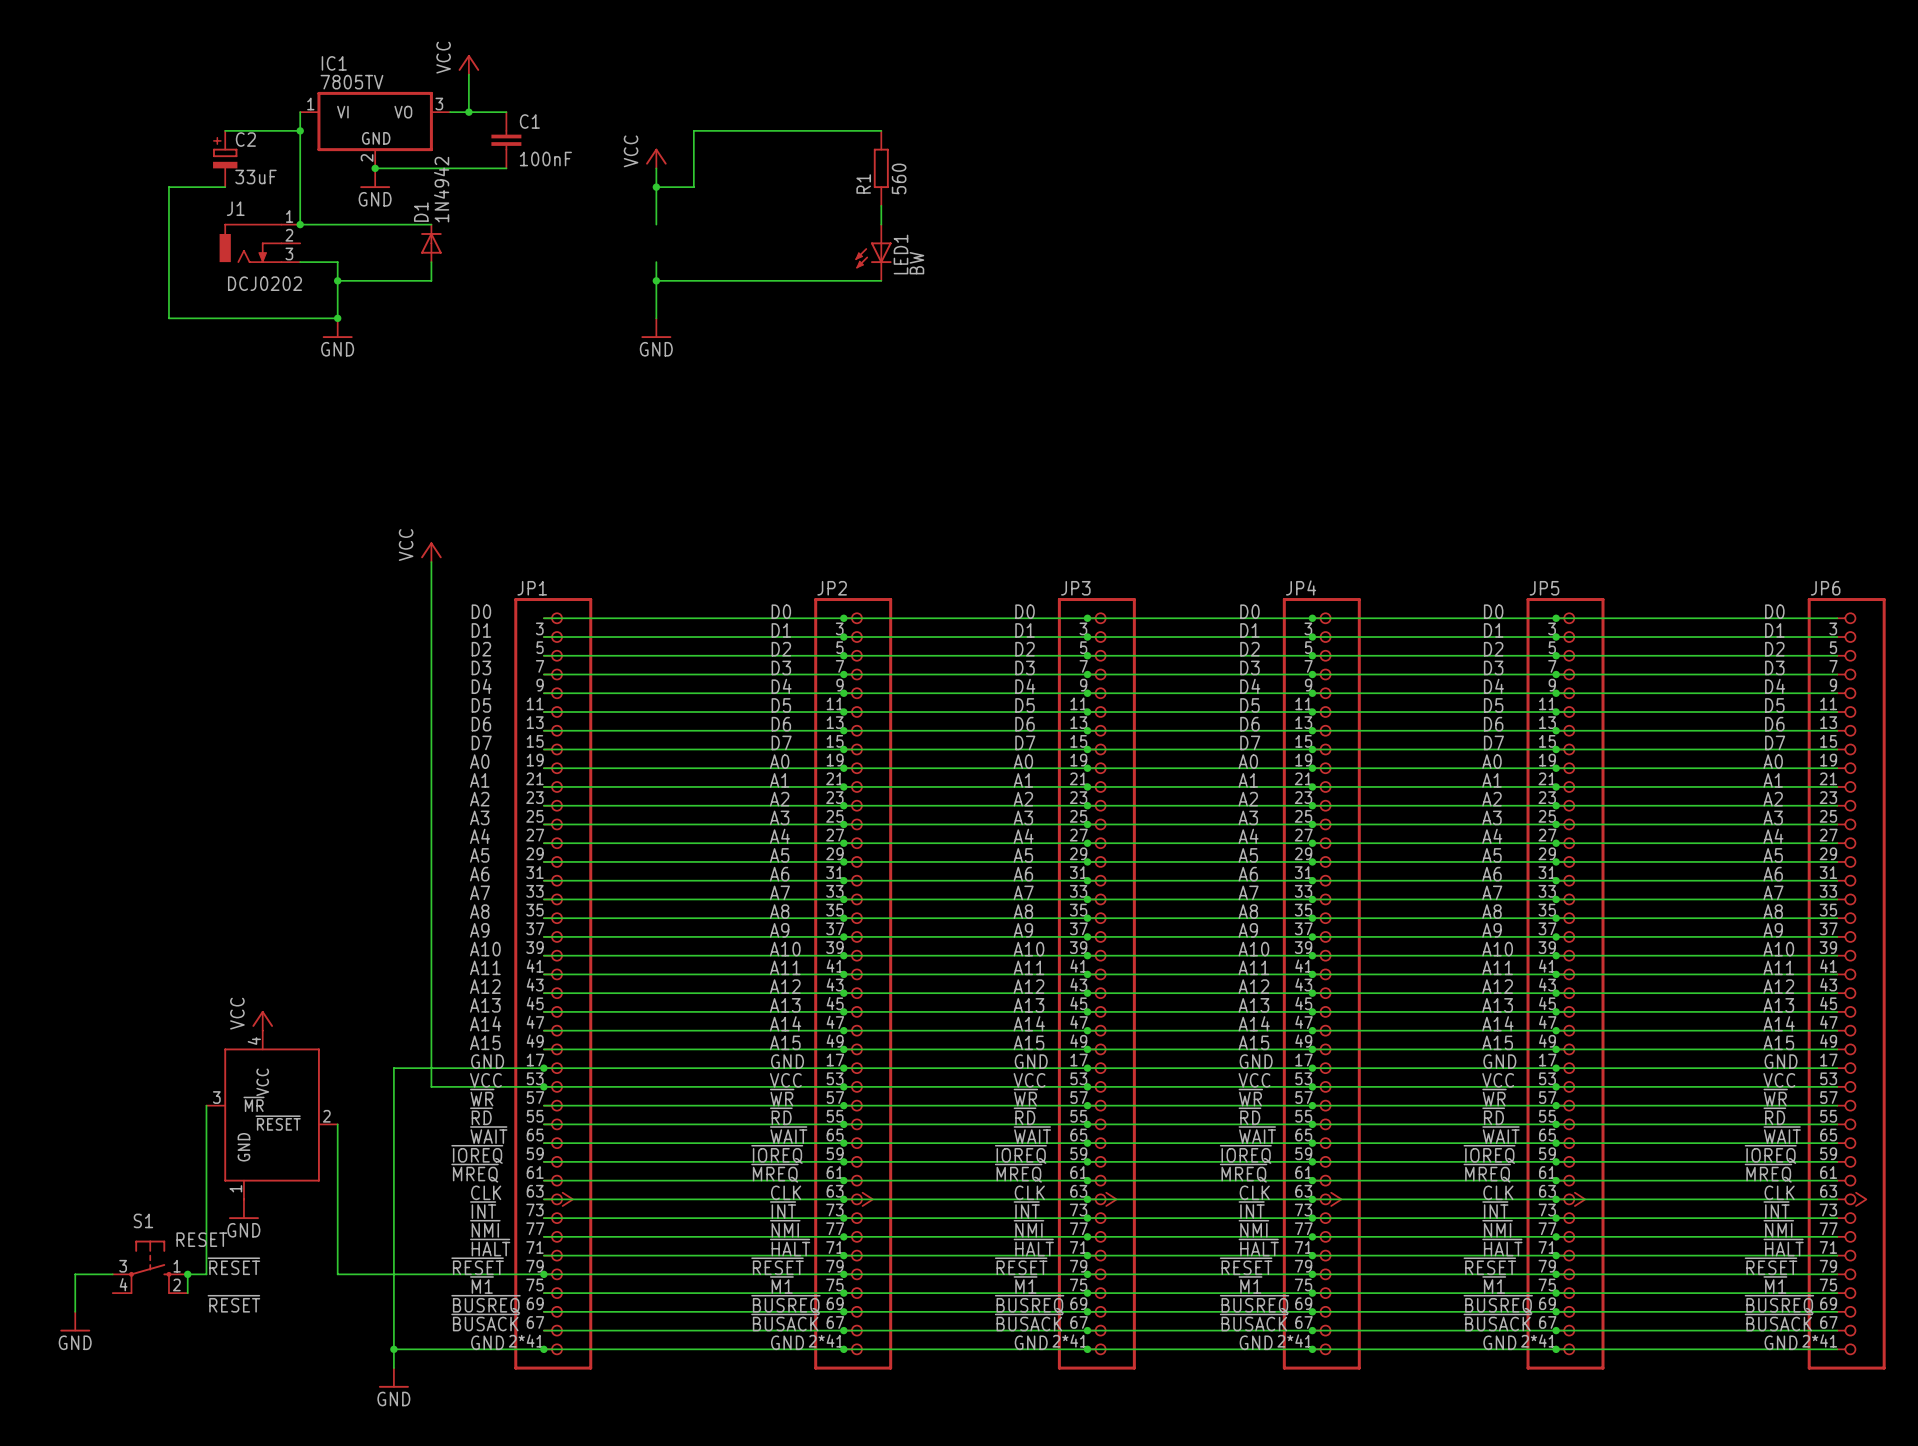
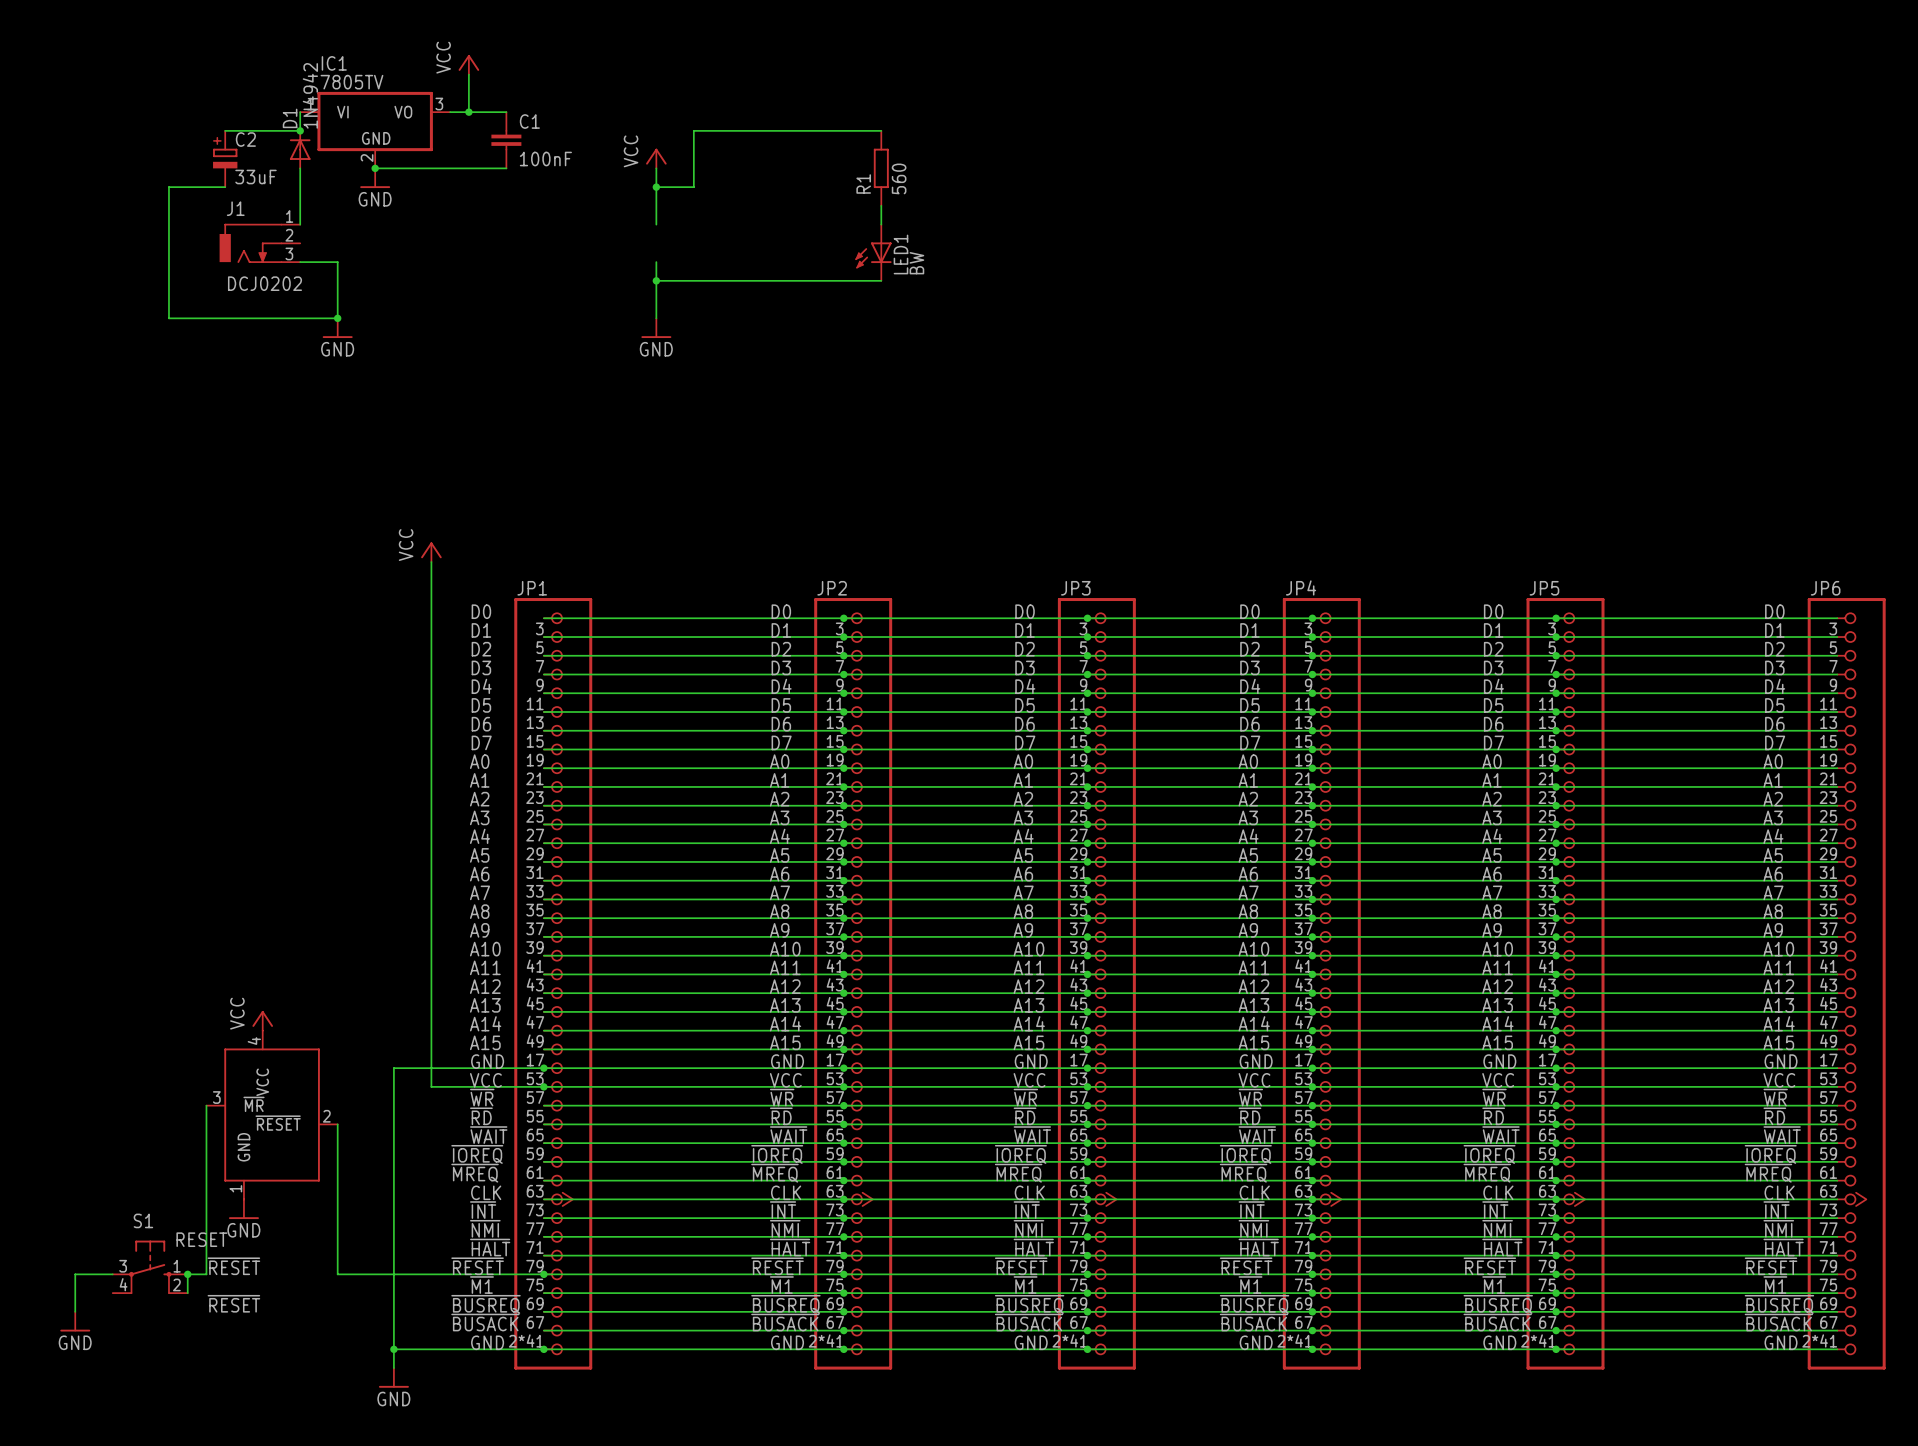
wire: (300, 224) (431, 224) -> none
junction: (300, 224) -> none
D1 position: (431, 243) -> (300, 149)
wire: (431, 262) (431, 280) (337, 280) -> none
junction: (337, 280) -> none

